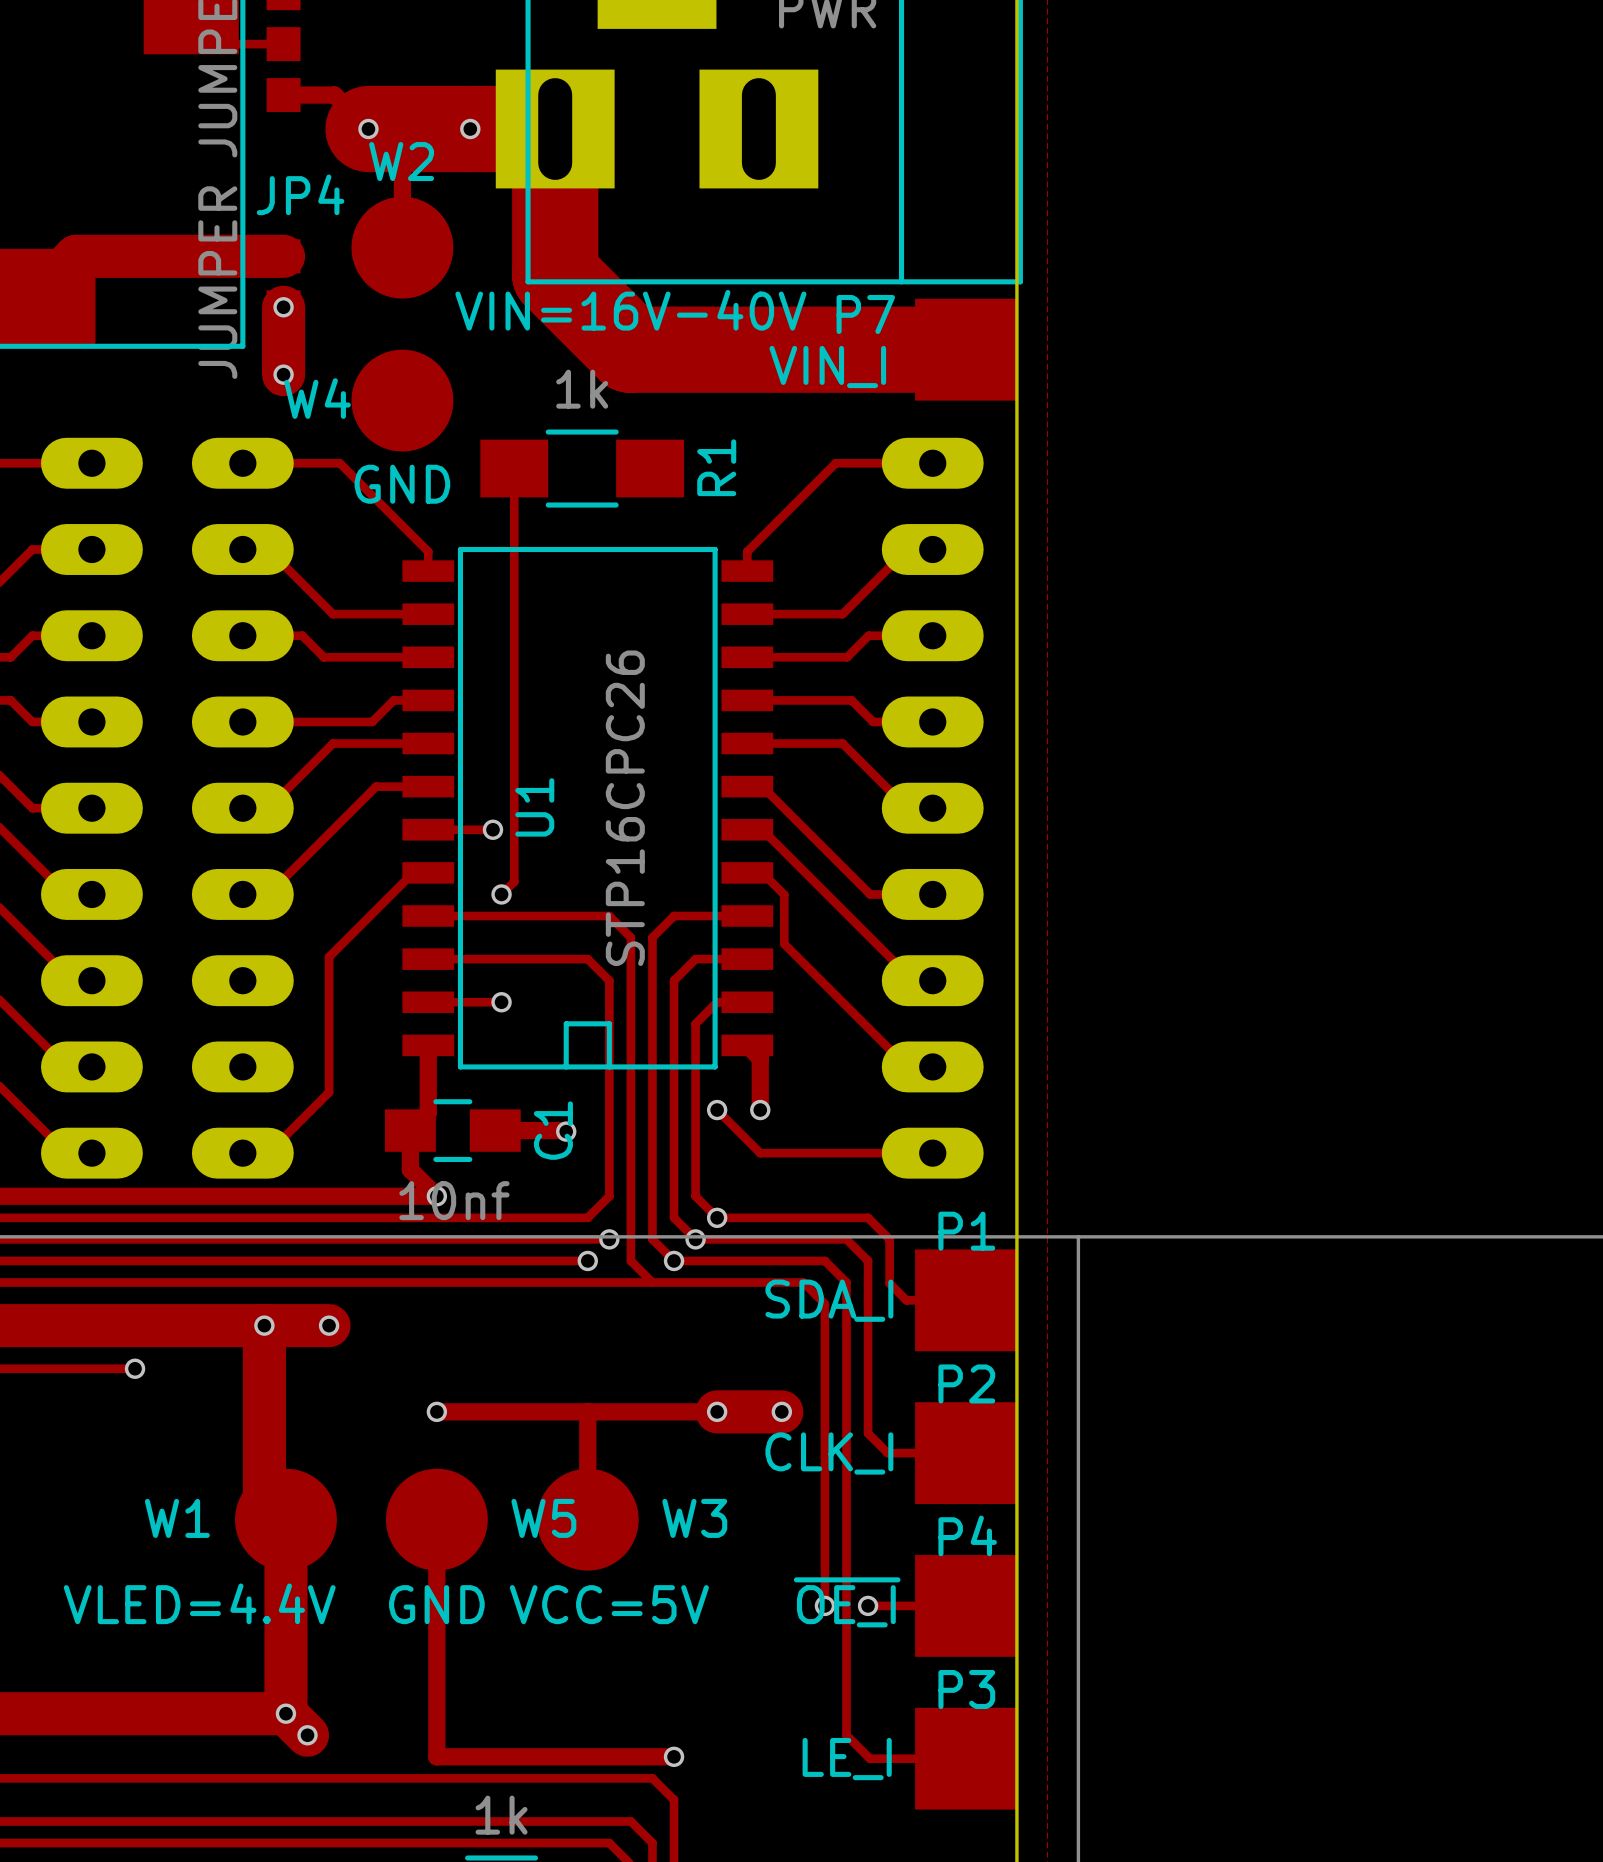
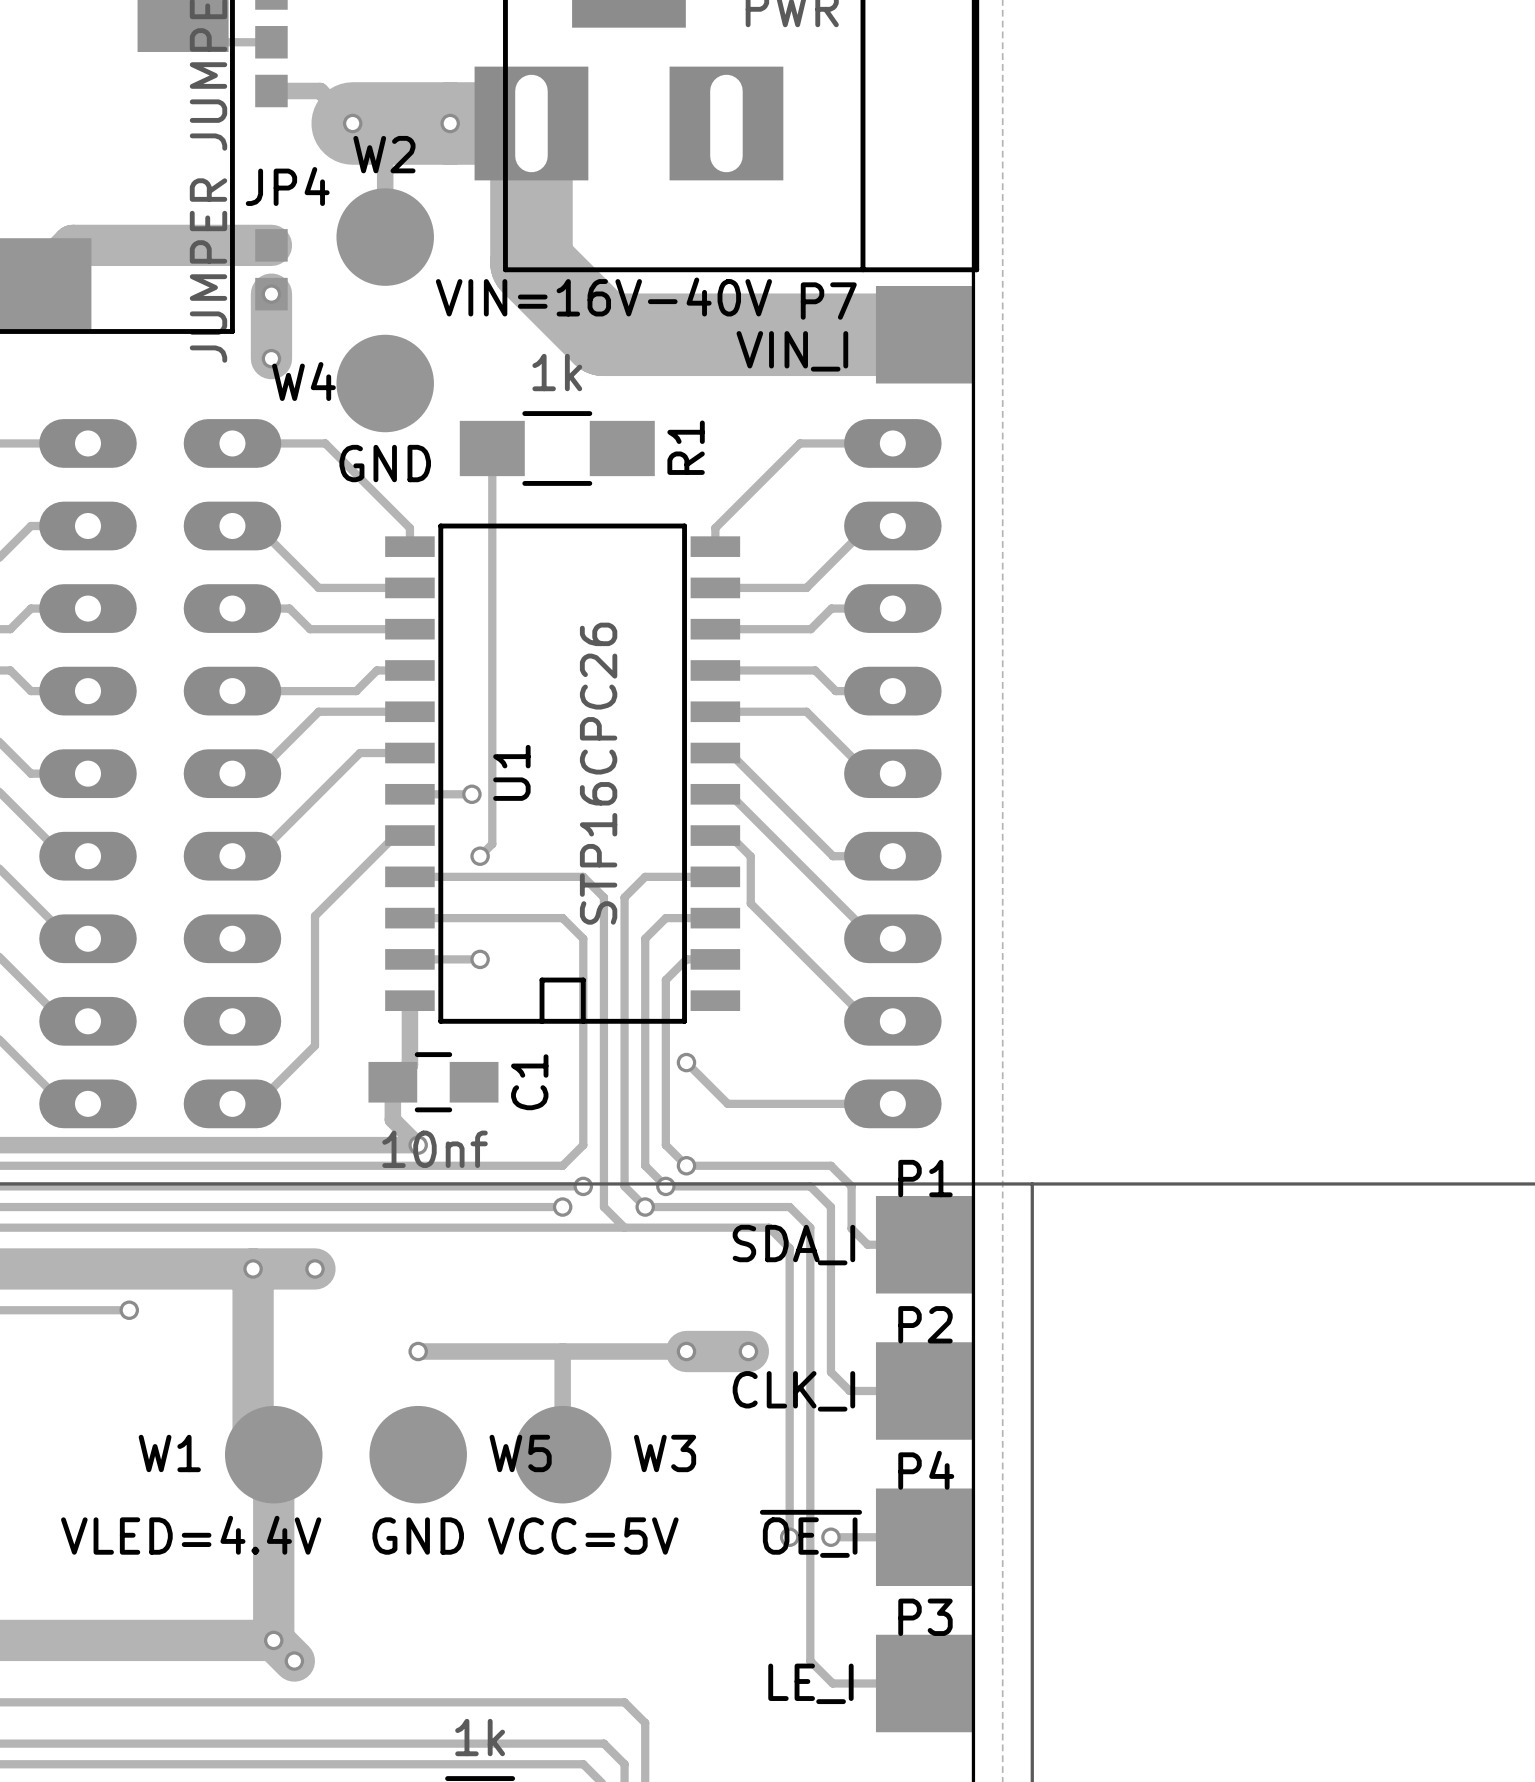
track: (747, 1045) (760, 1058) (760, 1110) -> none
via: (760, 1110) -> none
track: (495, 1130) (566, 1131) -> none
via: (566, 1131) -> none
track: (436, 1519) (436, 1756) (674, 1756) -> none
via: (674, 1756) -> none

